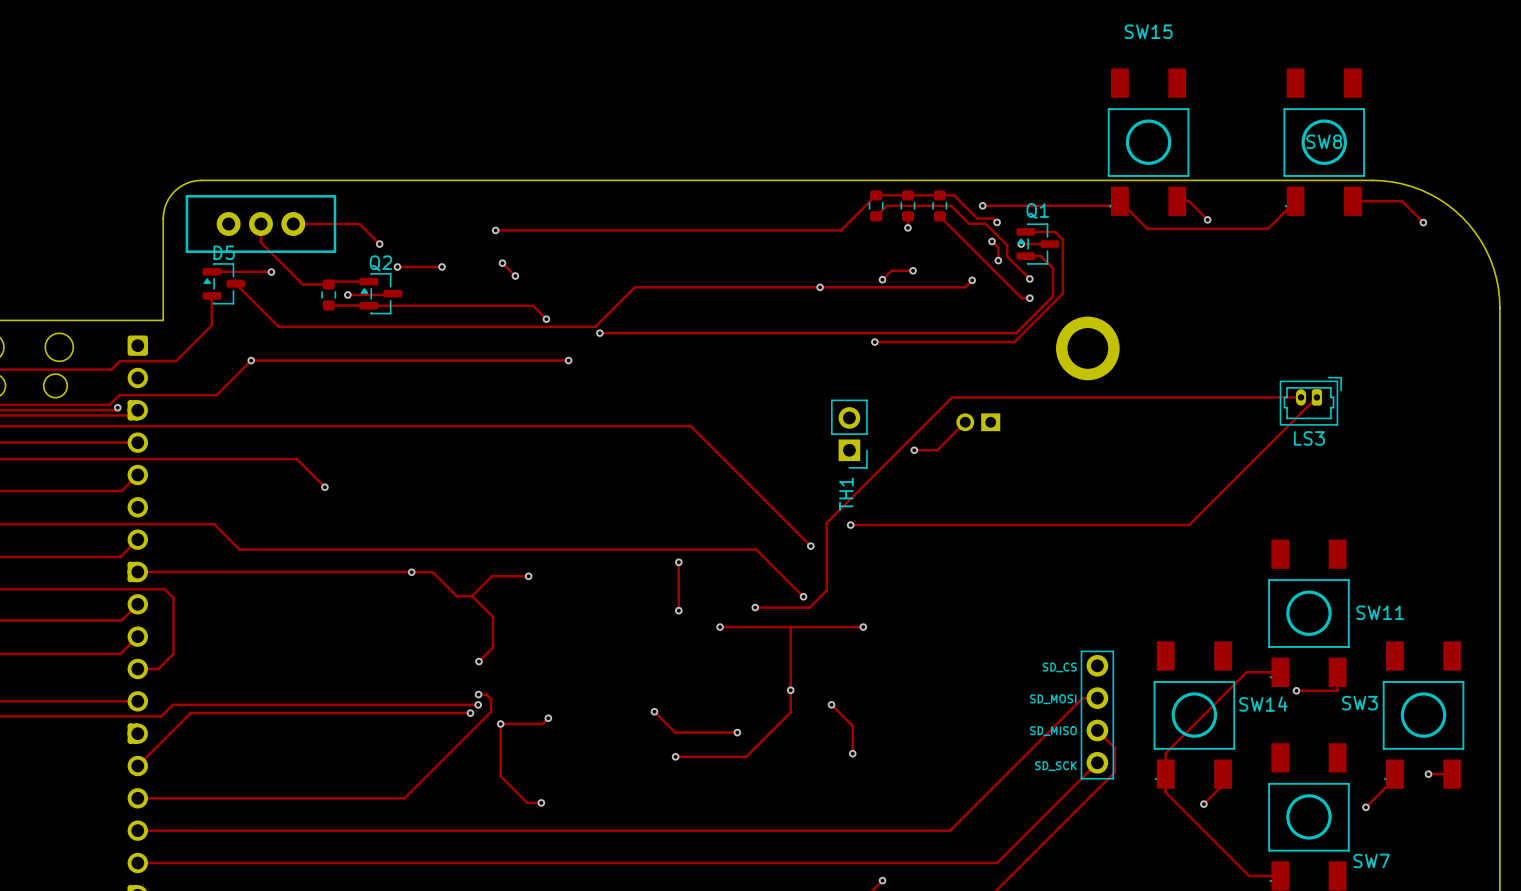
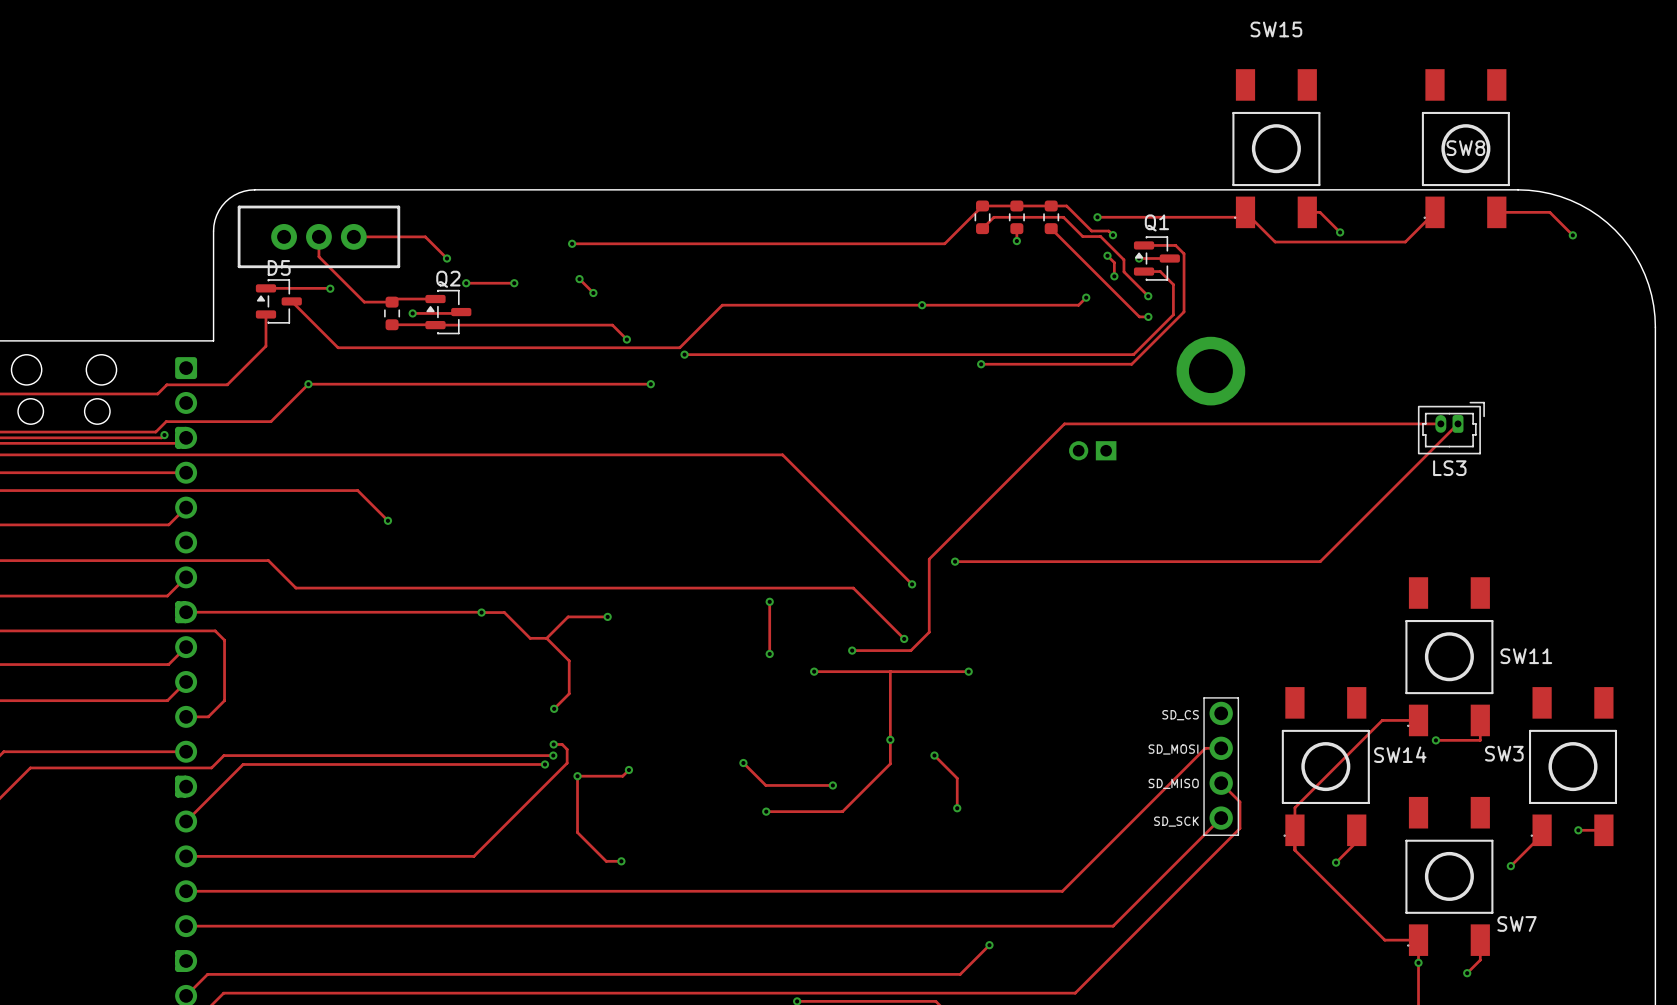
track: (913, 270) (891, 270) (882, 279) -> none
via: (913, 270) -> none
via: (882, 279) -> none
track: (965, 422) (937, 450) (914, 450) -> none
TH1: (849, 434) -> none
via: (914, 450) -> none

